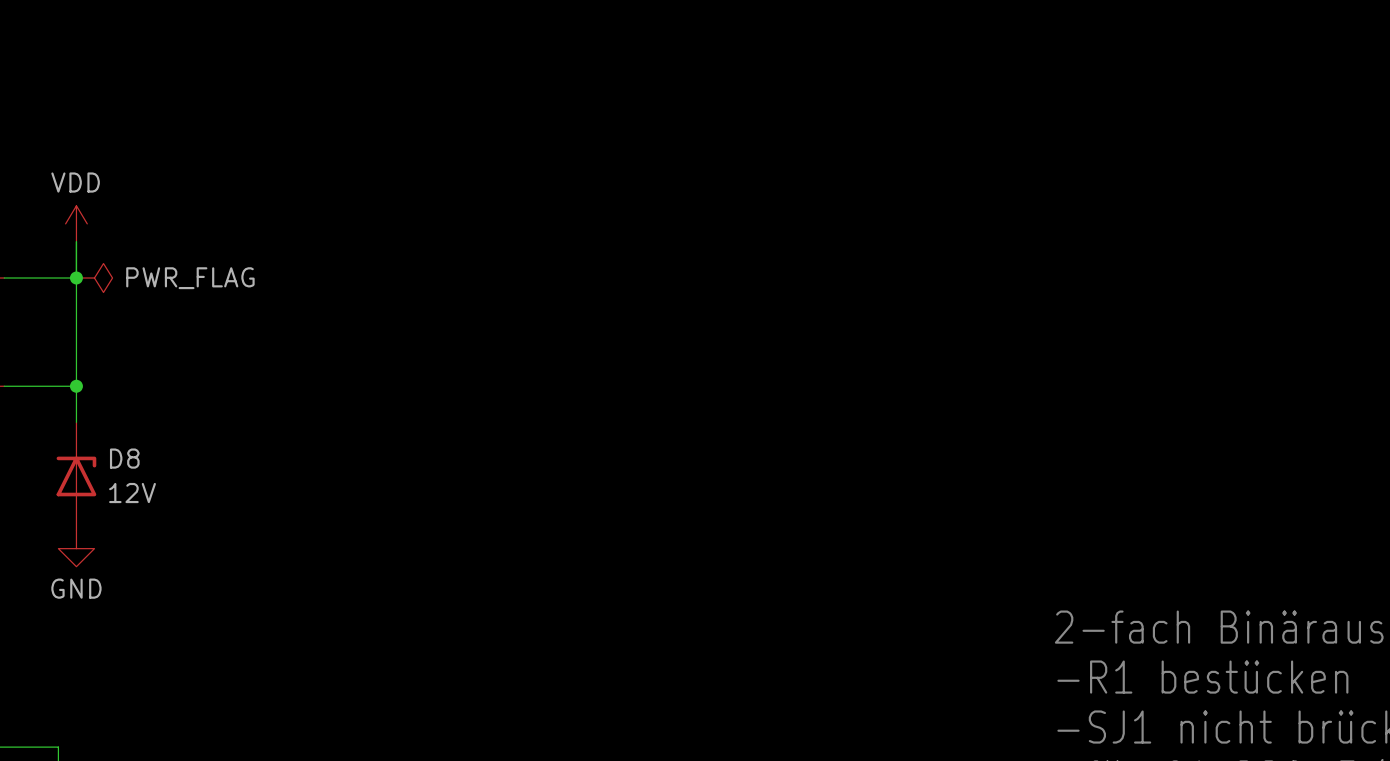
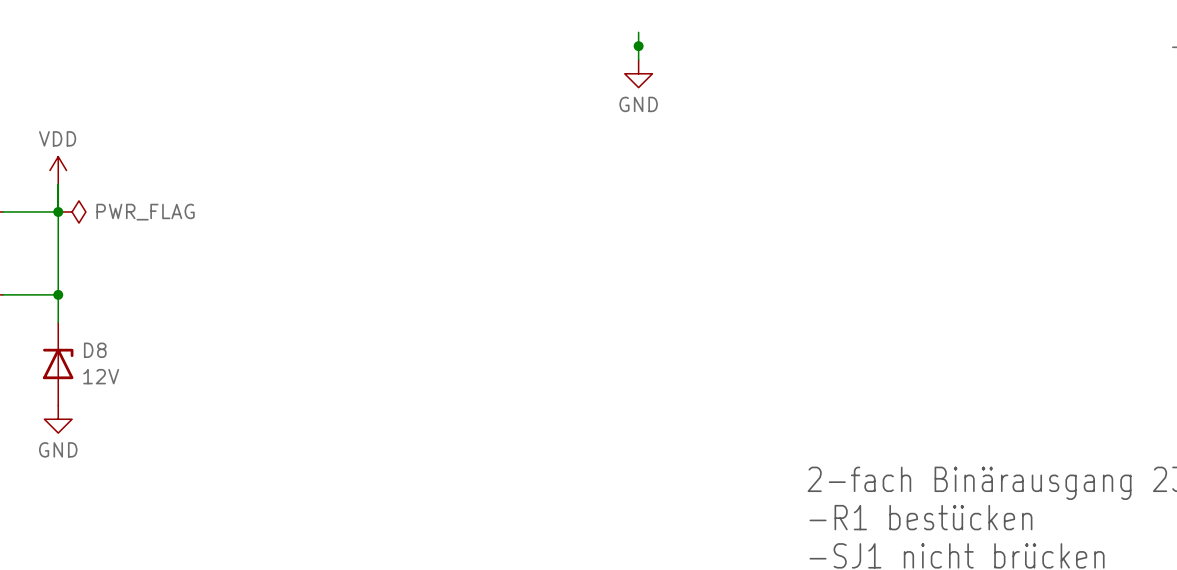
wire: none -> (638, 32) (638, 59)
junction: none -> (638, 46)
power symbol: none -> GND (638, 73)

